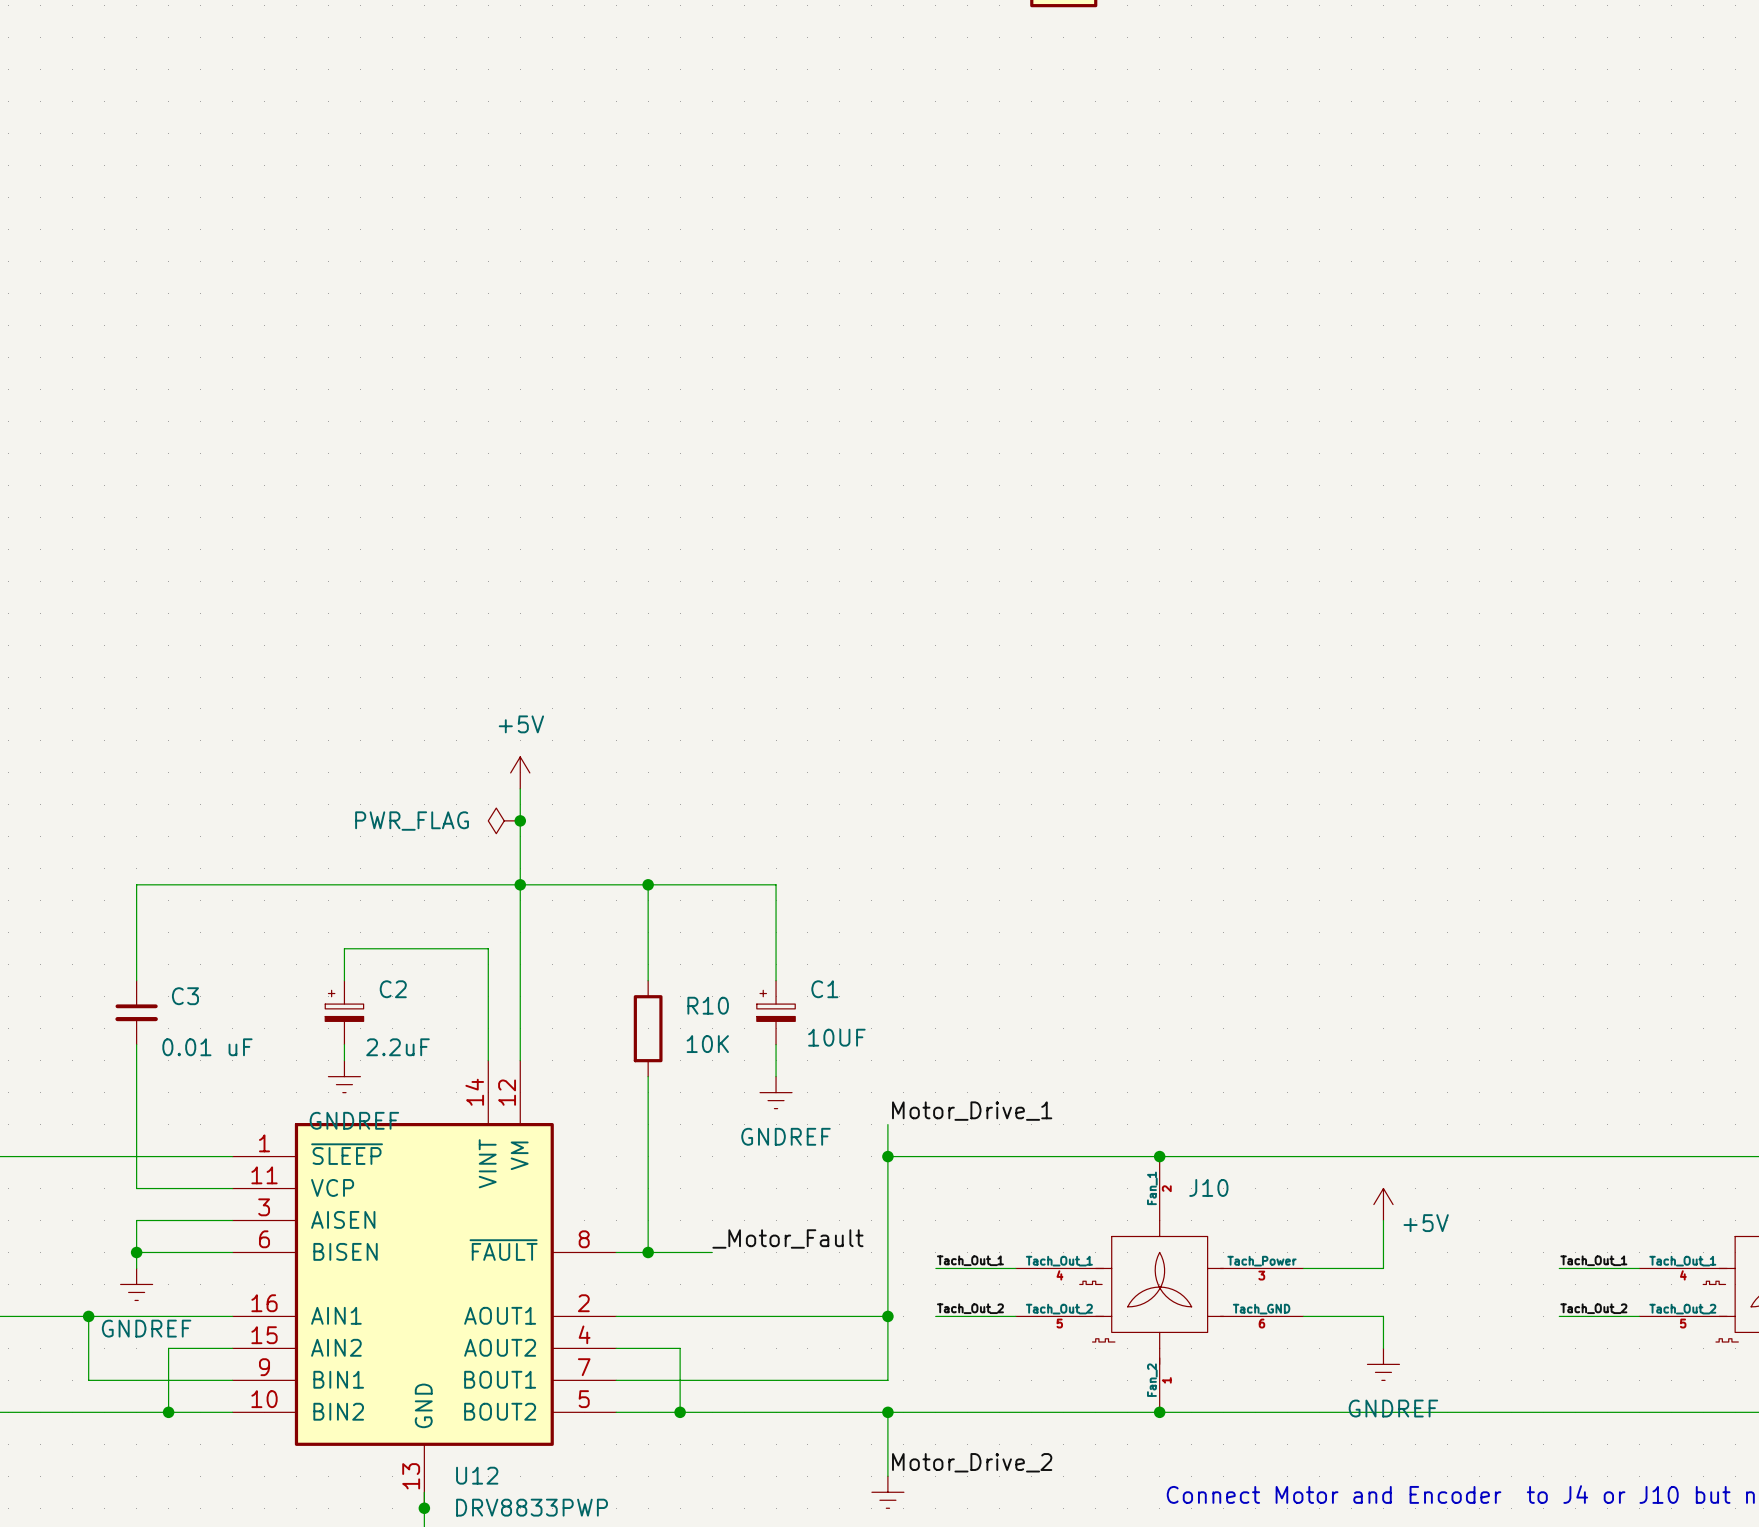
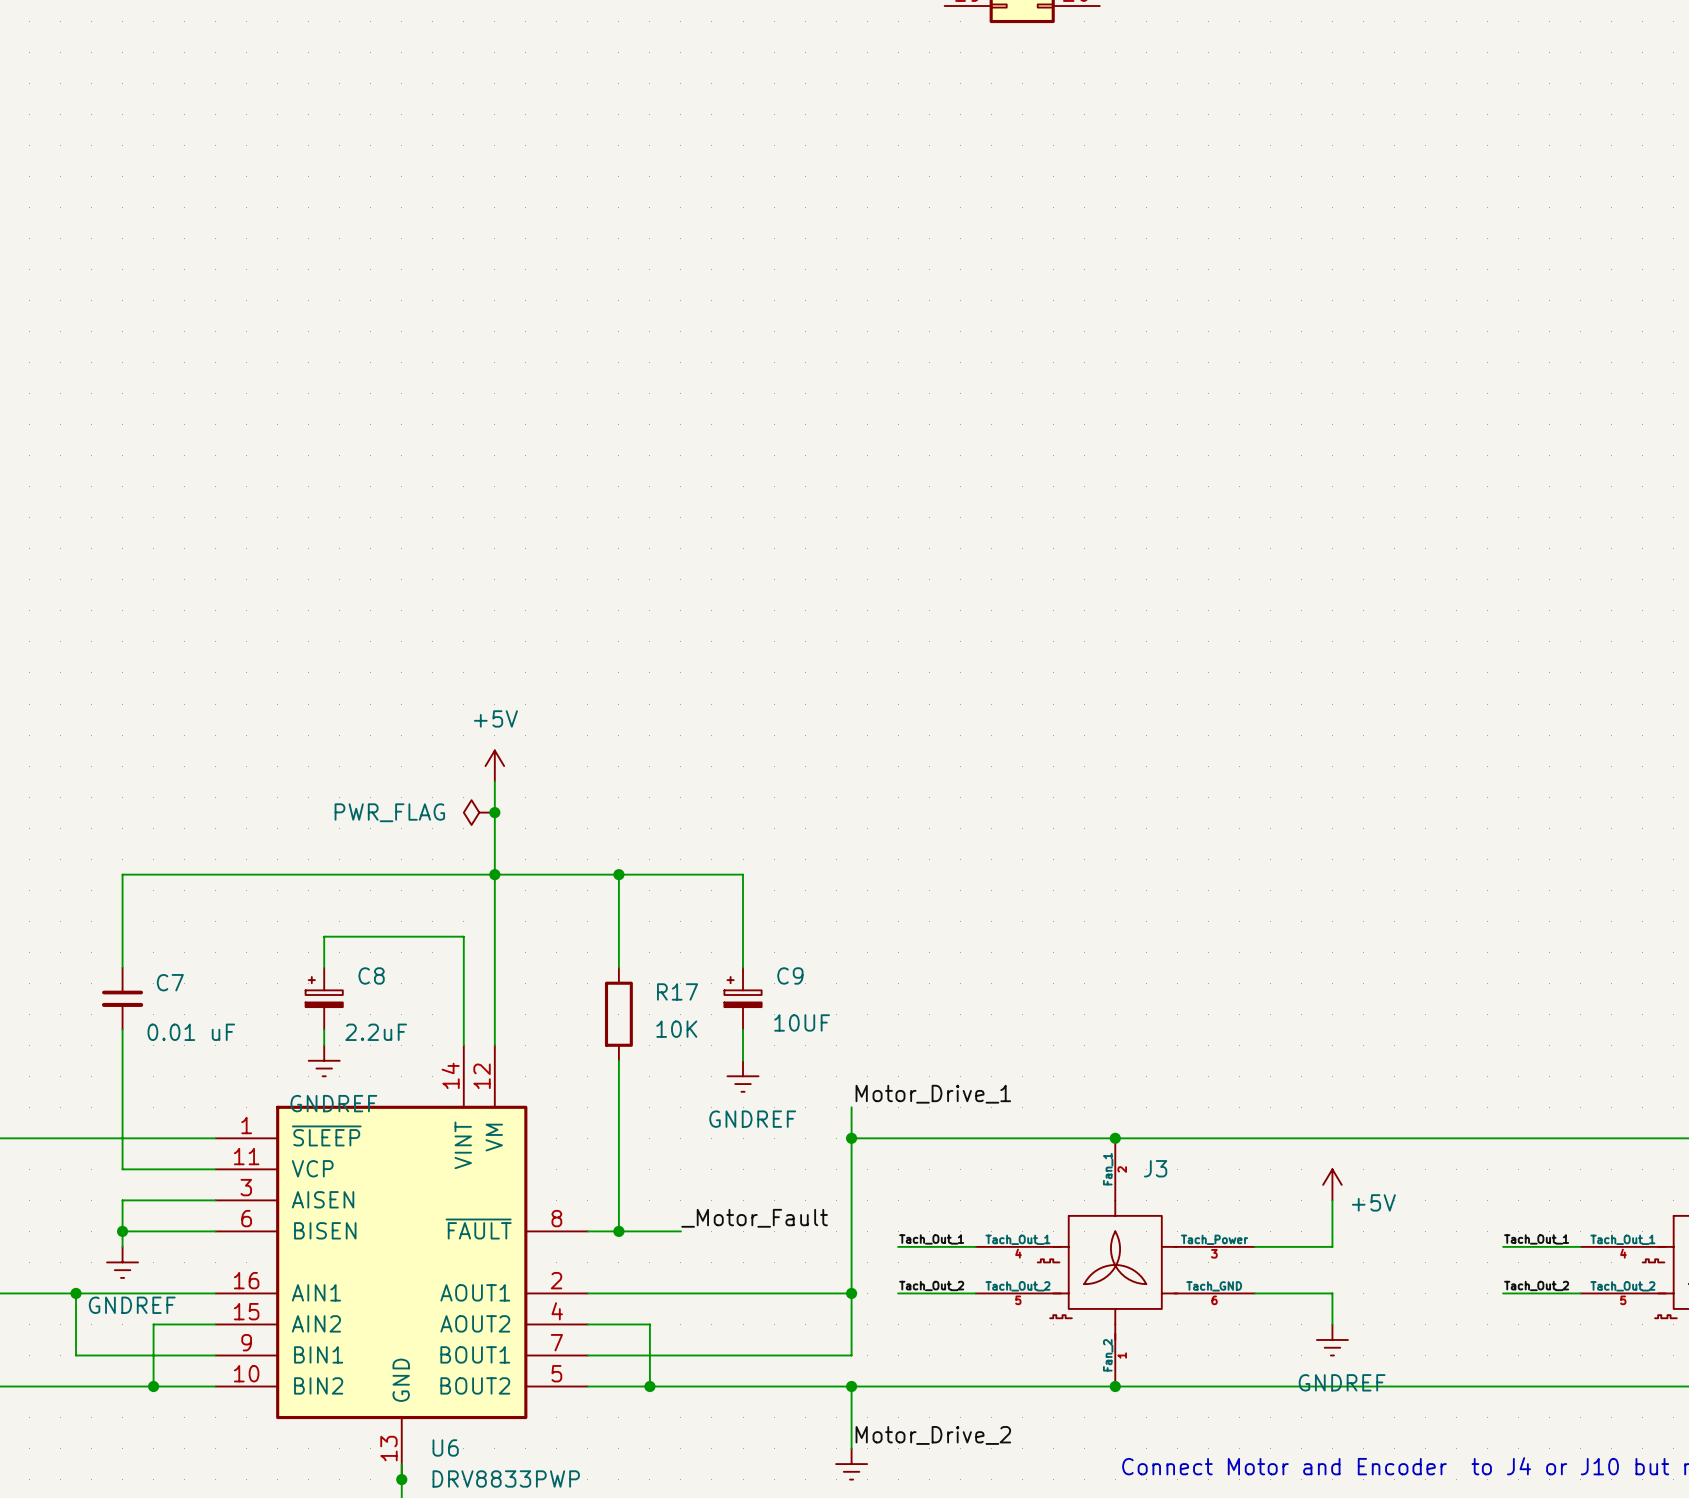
C2 name: C2 (393, 989) -> C8 (371, 975)
C1 name: C1 (824, 989) -> C9 (790, 975)
C3 name: C3 (185, 996) -> C7 (170, 982)
R10 name: R10 (708, 1005) -> R17 (677, 991)
J10 name: J10 (1208, 1187) -> J3 (1155, 1168)
U12 name: U12 (477, 1475) -> U6 (445, 1447)

